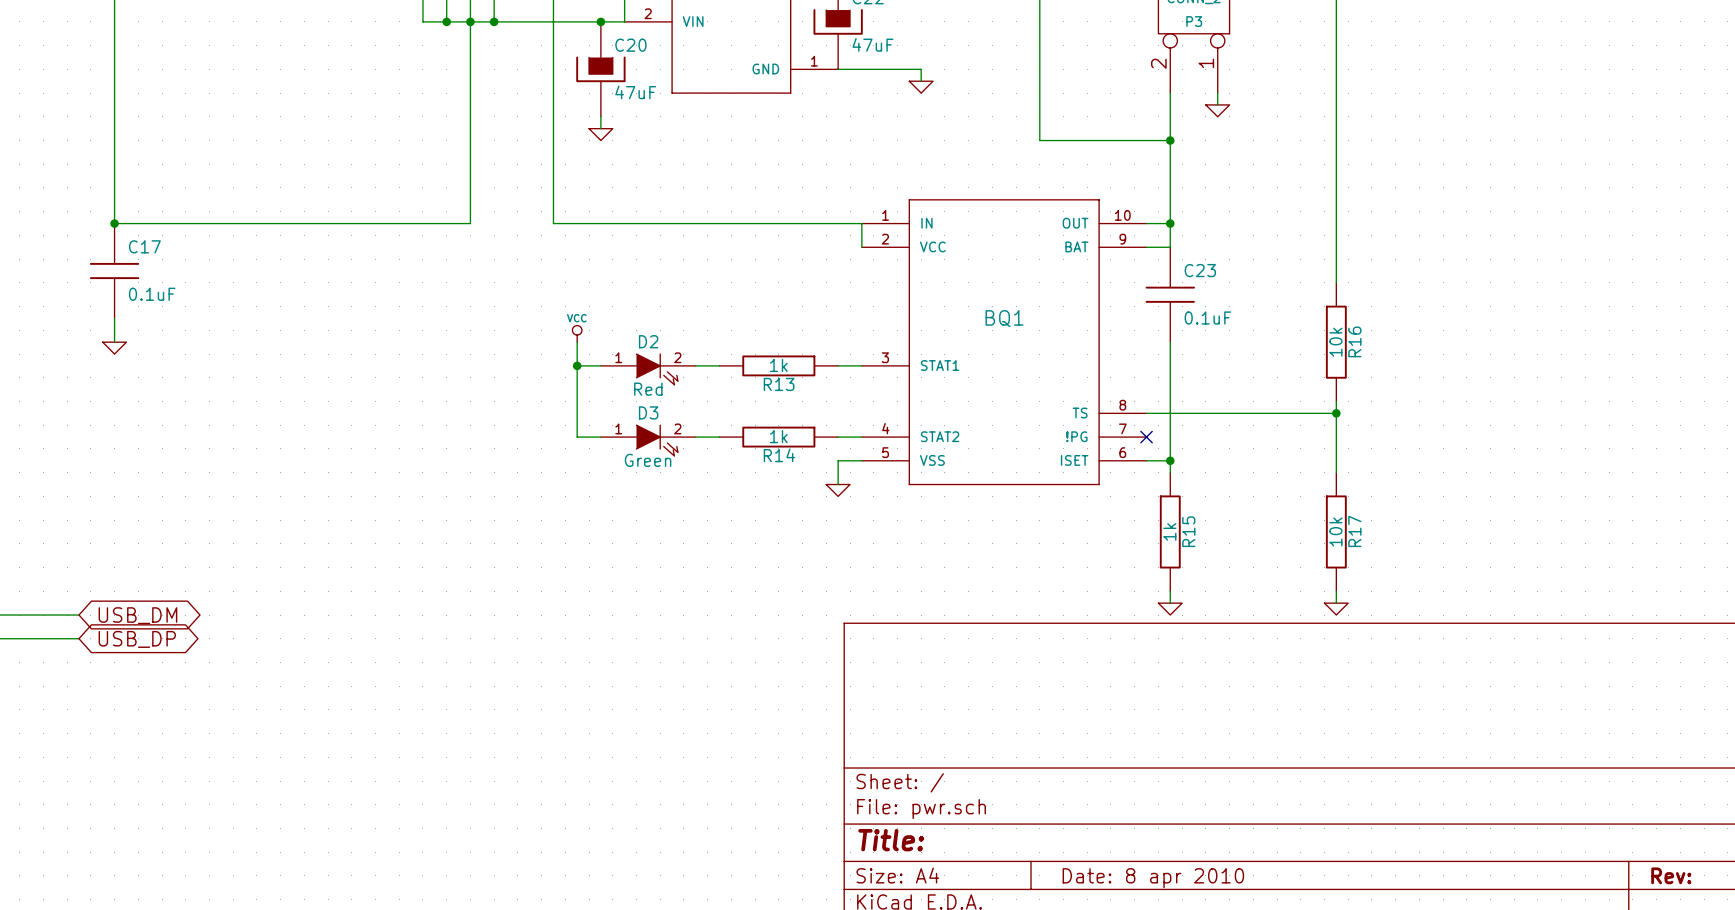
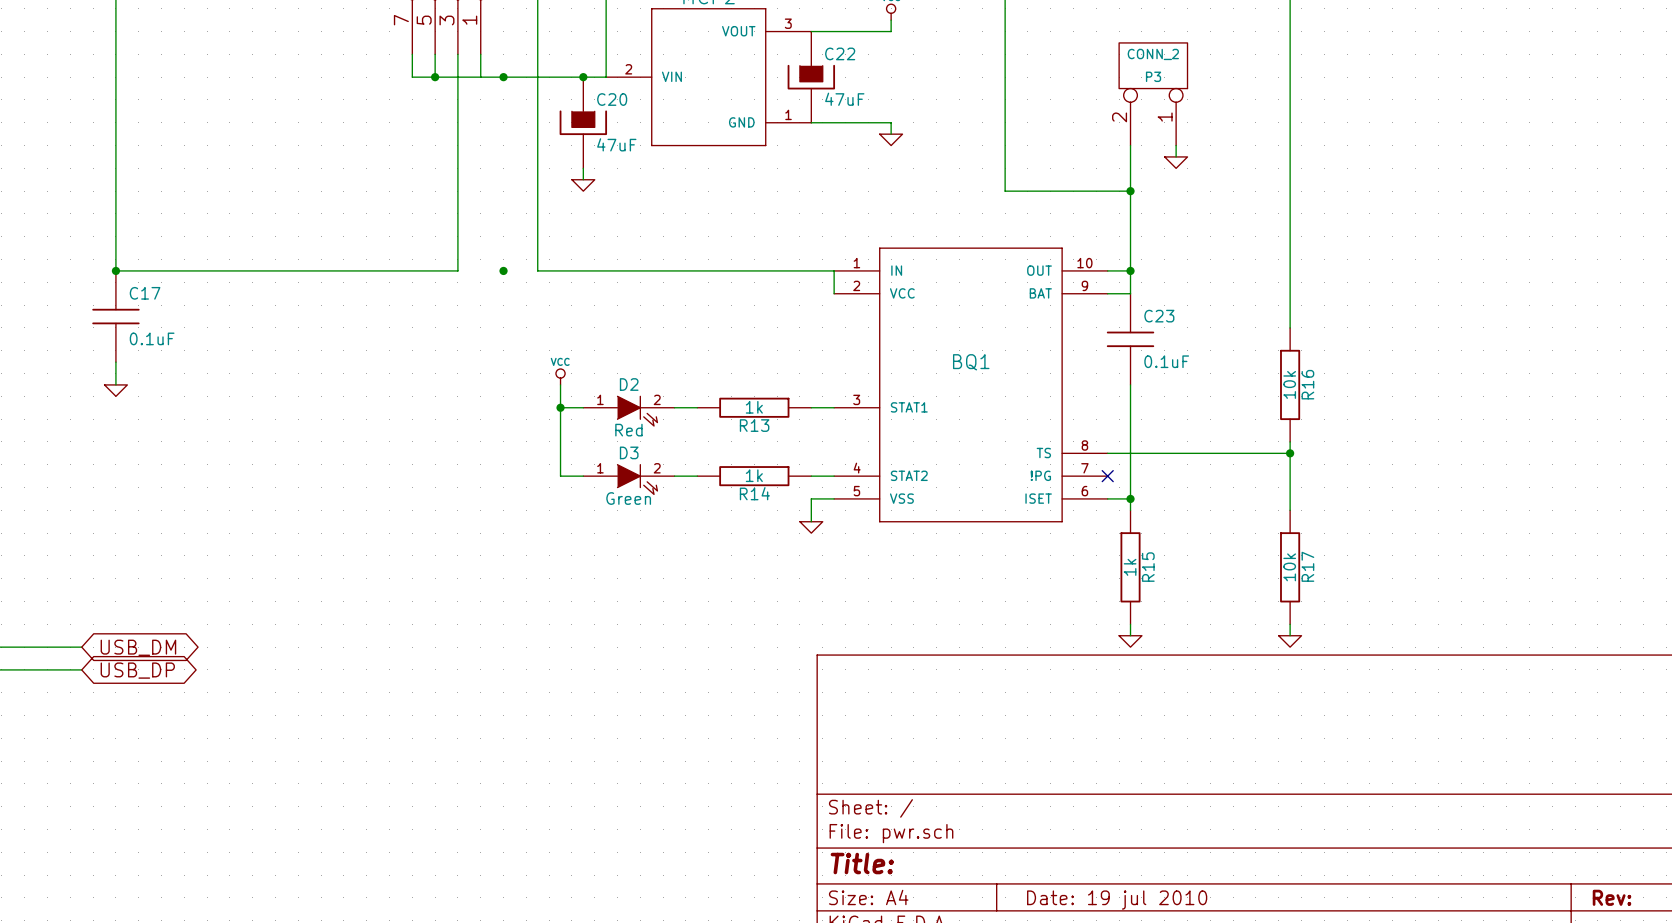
junction: (470, 21) -> none
junction: (494, 21) -> none
junction: none -> (503, 77)
junction: none -> (503, 270)
title block: Date: 8 apr 2010 (1153, 878) -> Date: 19 jul 2010 (1117, 900)

